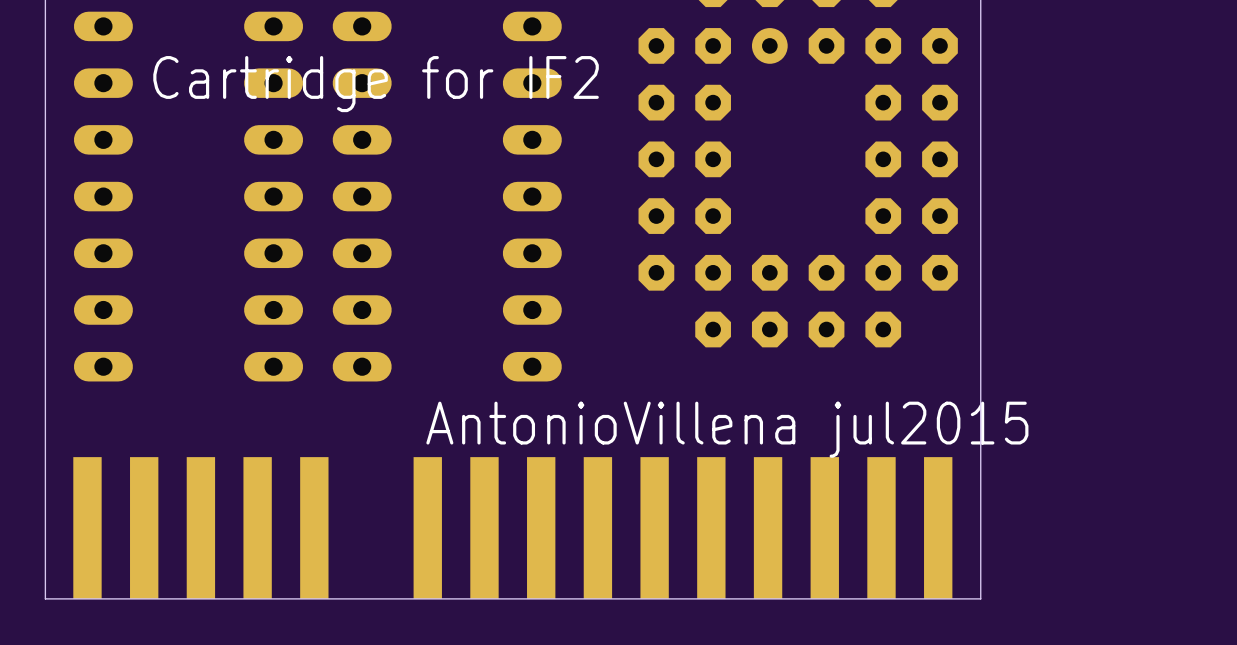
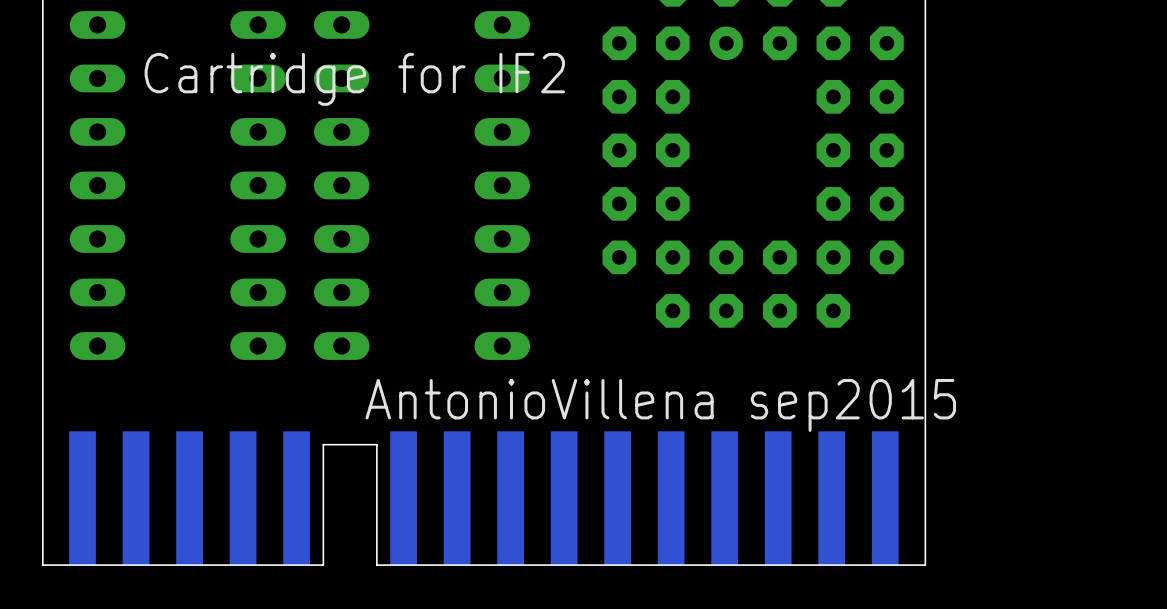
text: AntonioVillena jul2015 (727, 429) -> AntonioVillena sep2015 (660, 405)
board edge: (399, 598) (342, 598) -> (376, 565) (376, 444) (323, 444) (323, 565)

